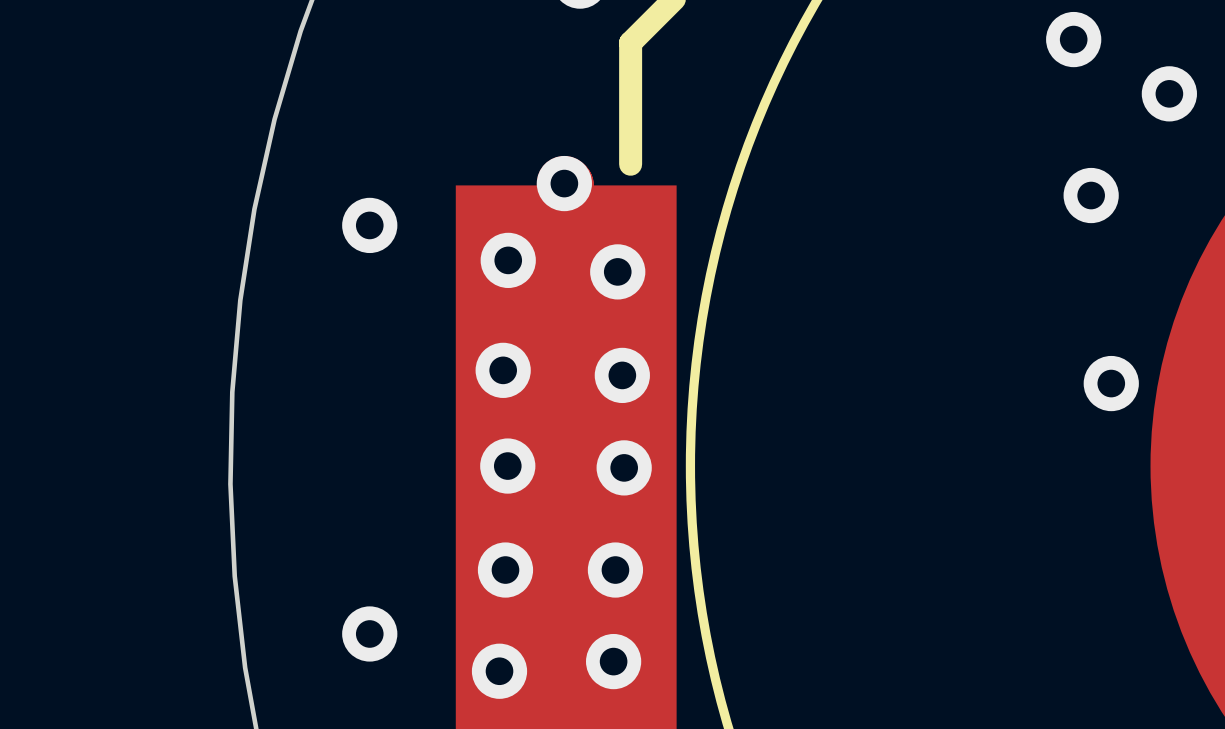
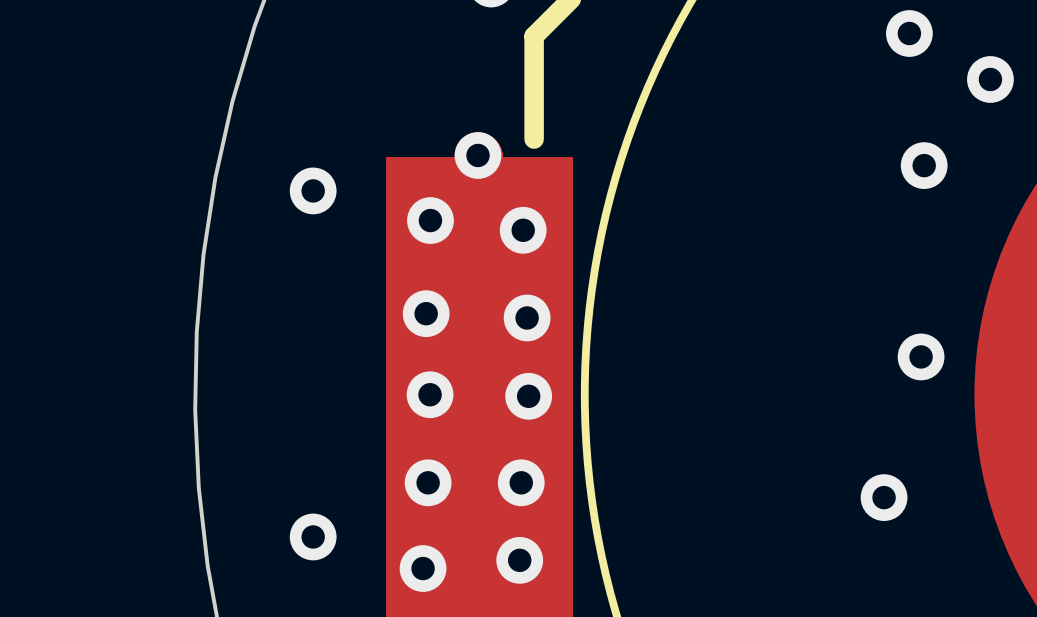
via position: (1111, 383) -> (921, 356)
via: none -> (884, 497)

